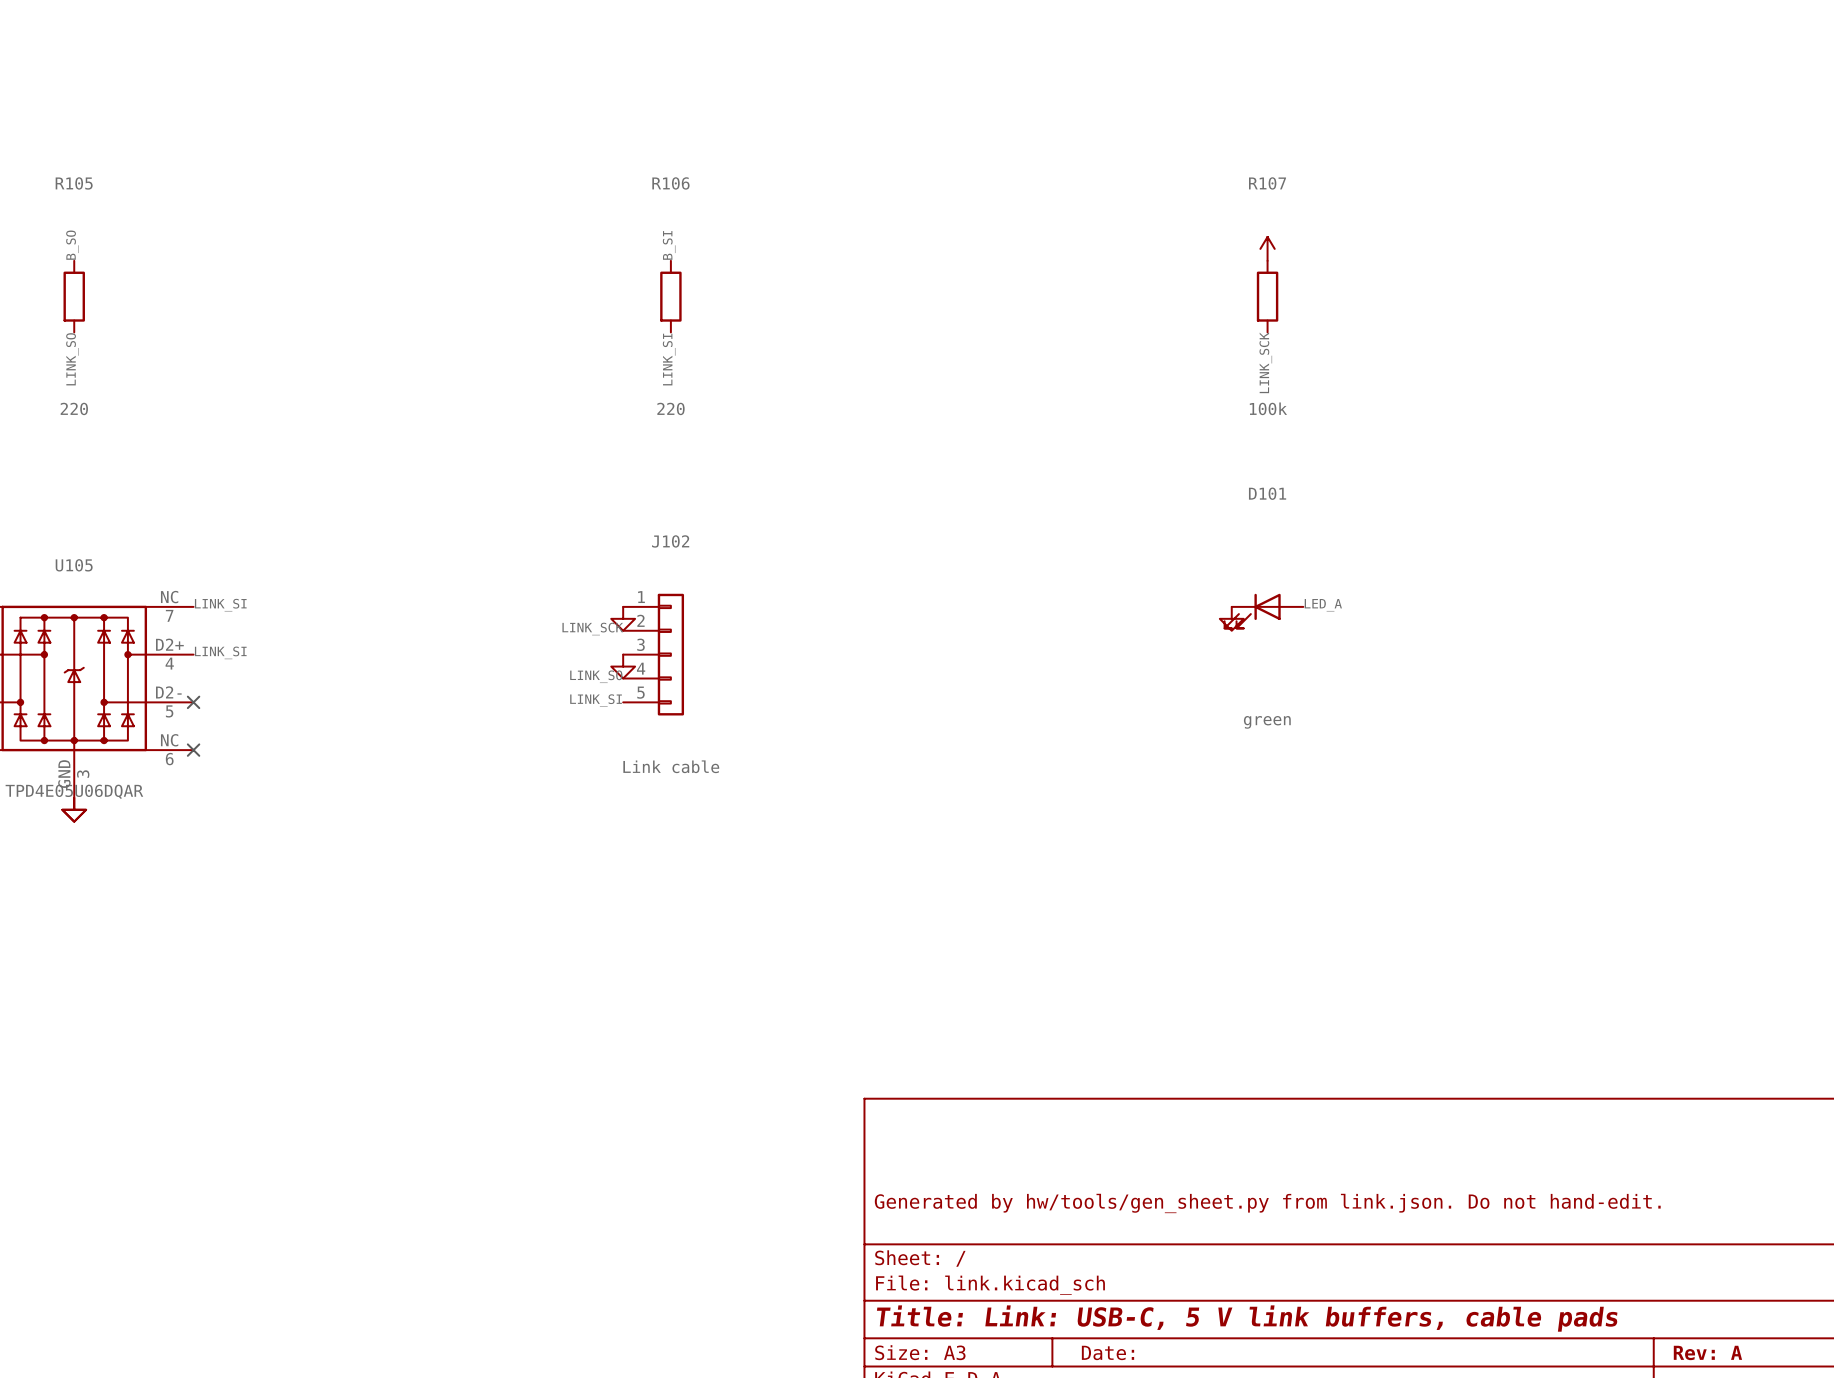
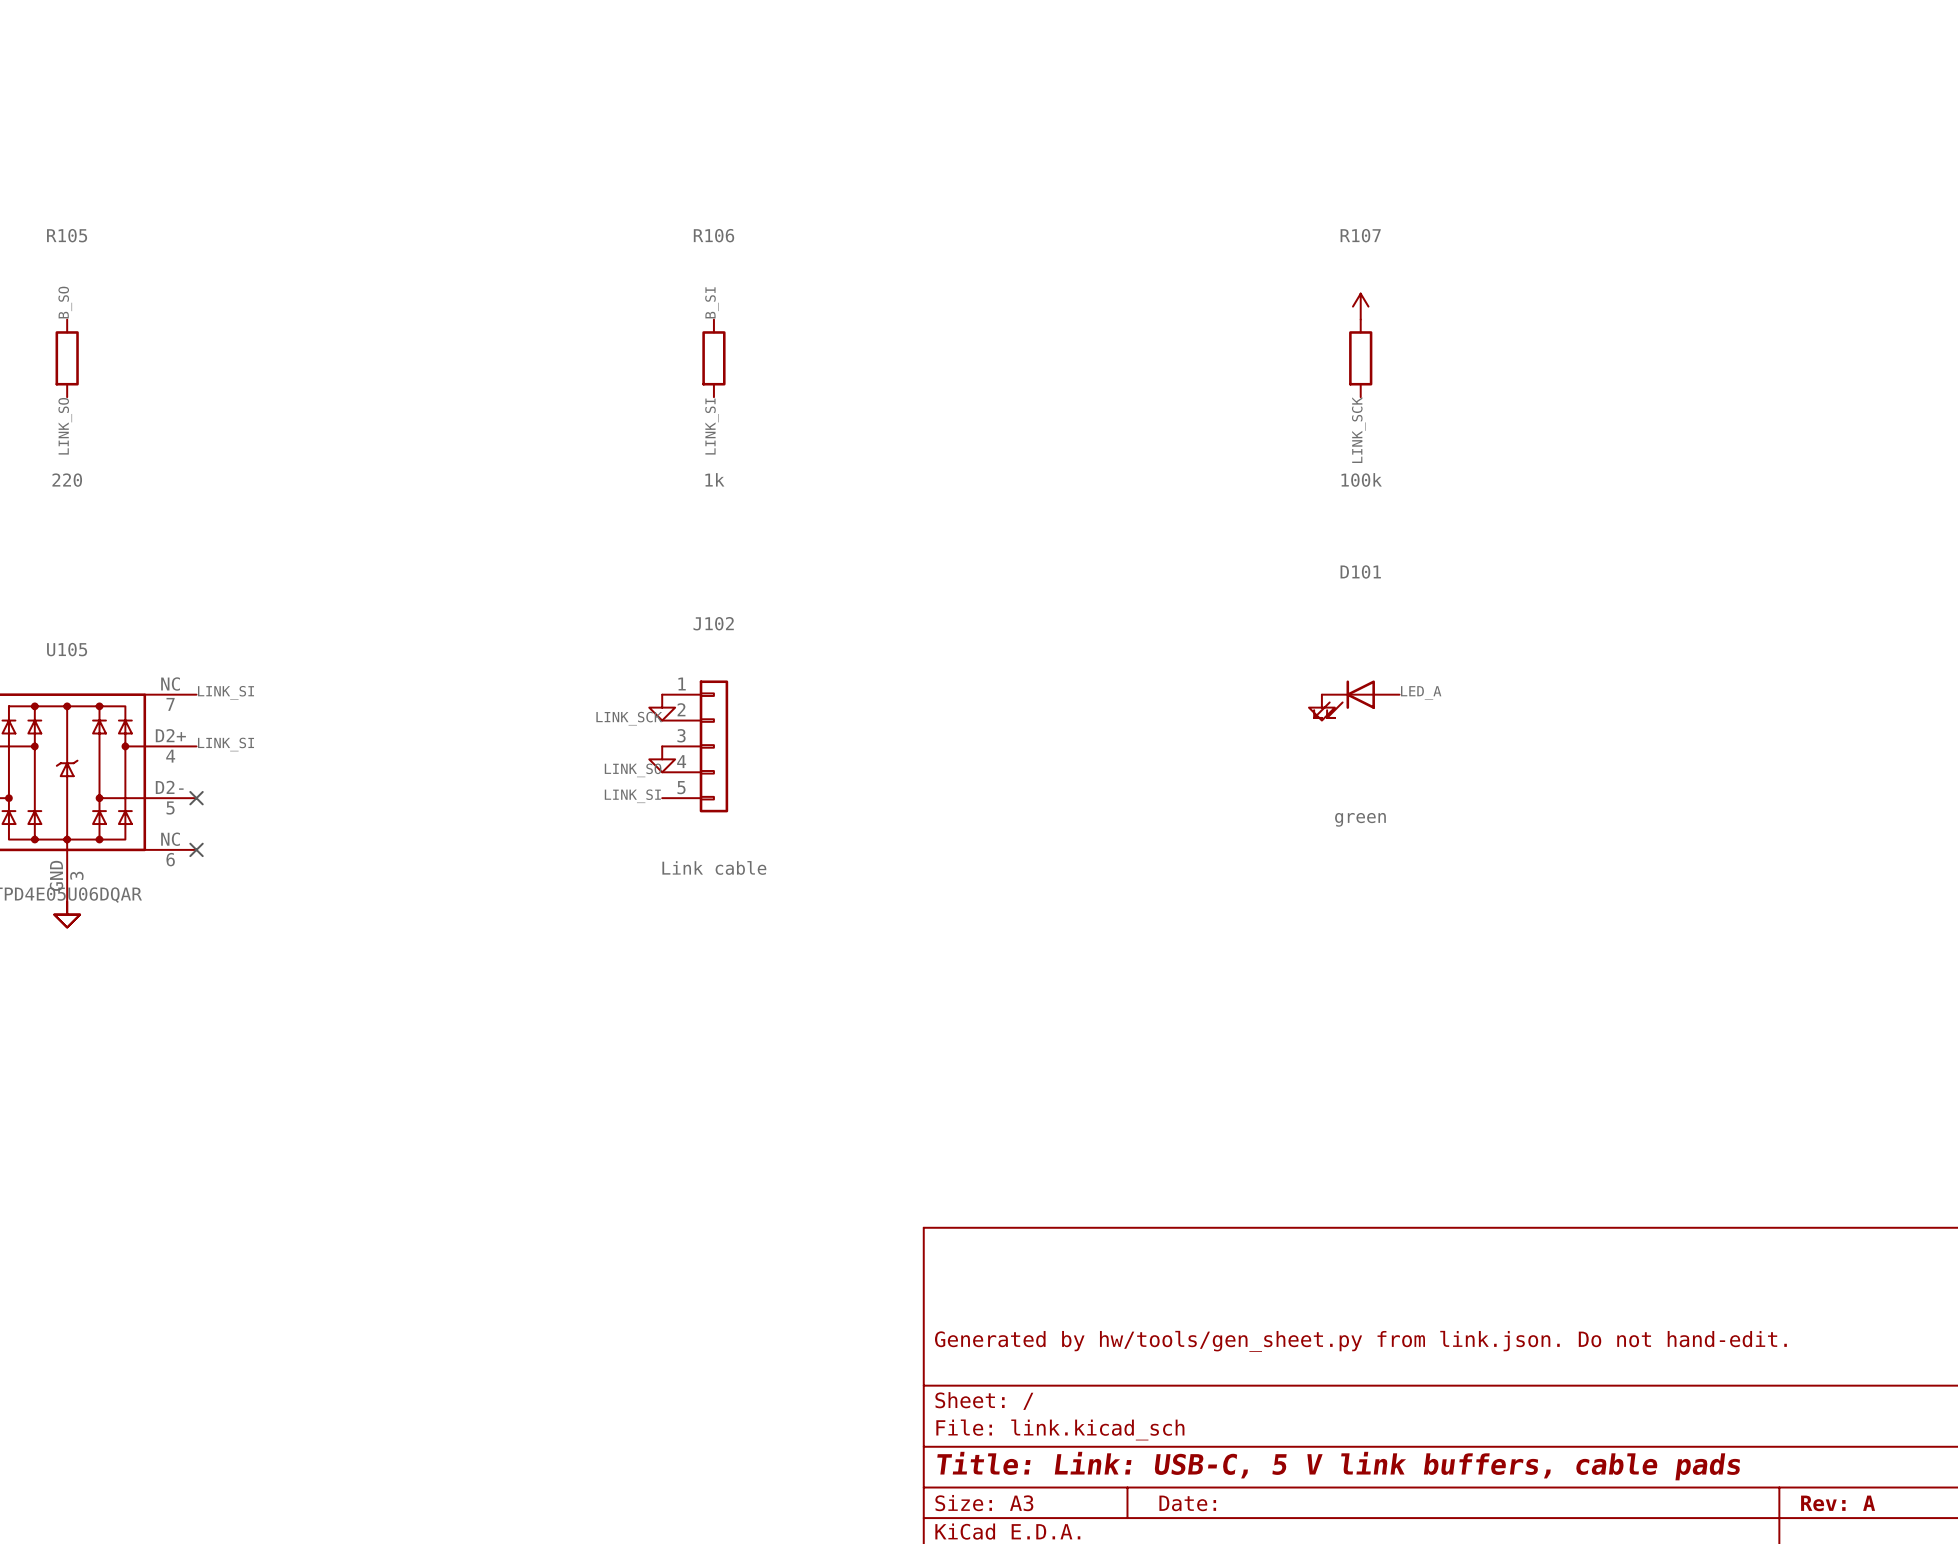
R106 value: 220 (670, 408) -> 1k (714, 479)

